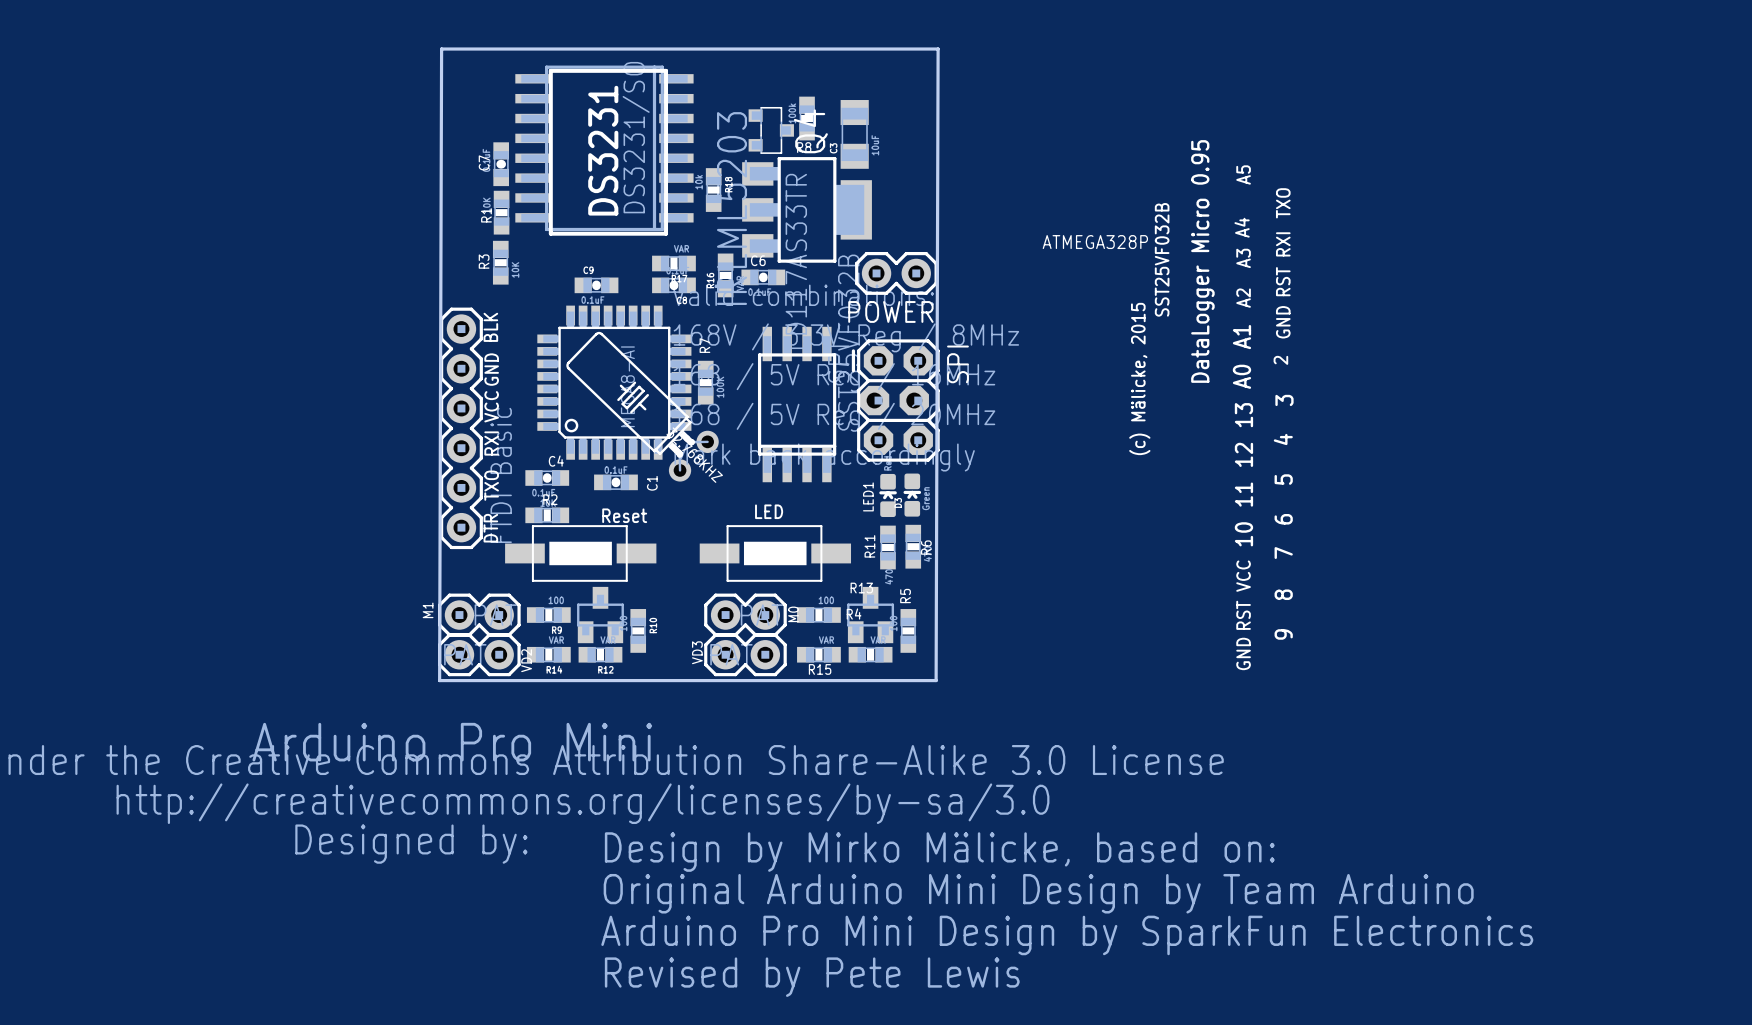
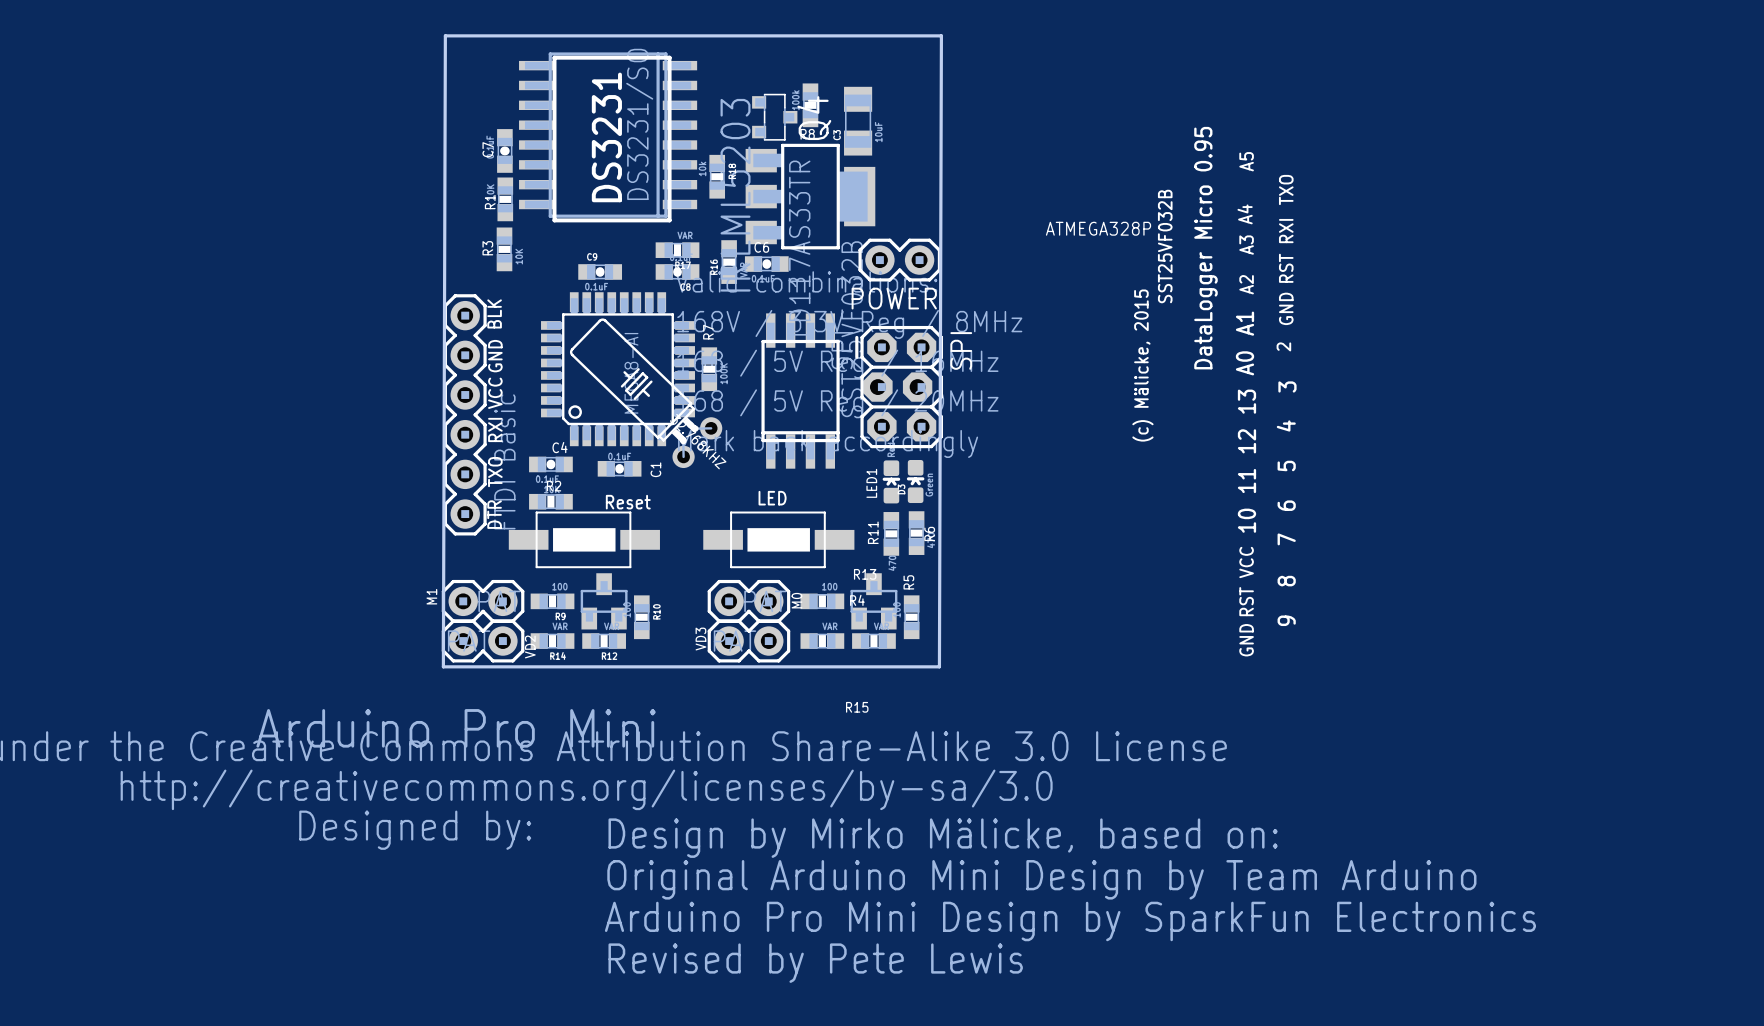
R15 name position: R15 (820, 669) -> R15 (857, 707)

